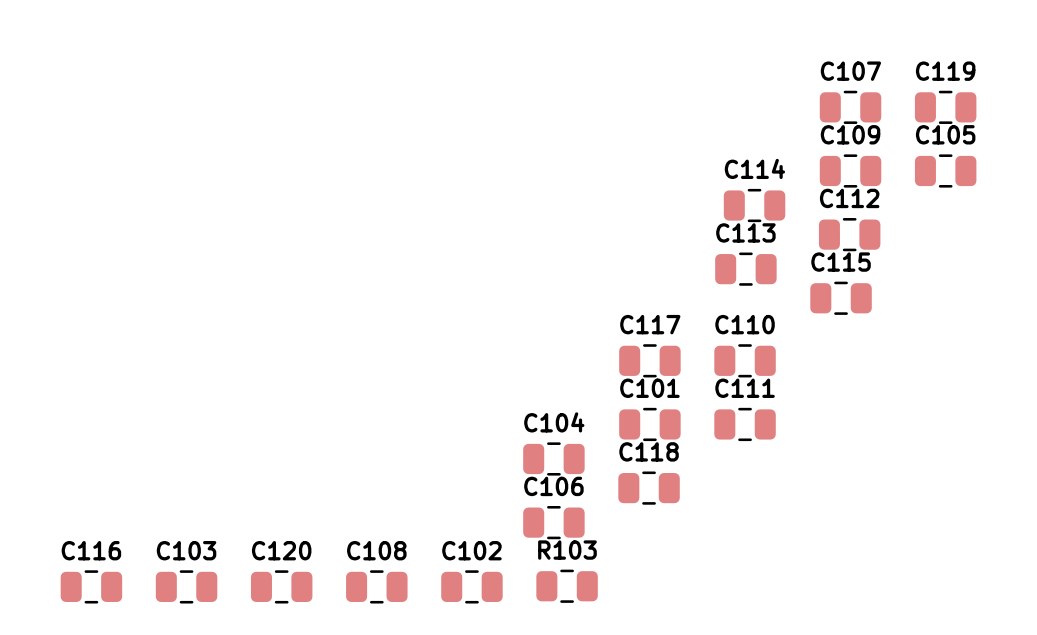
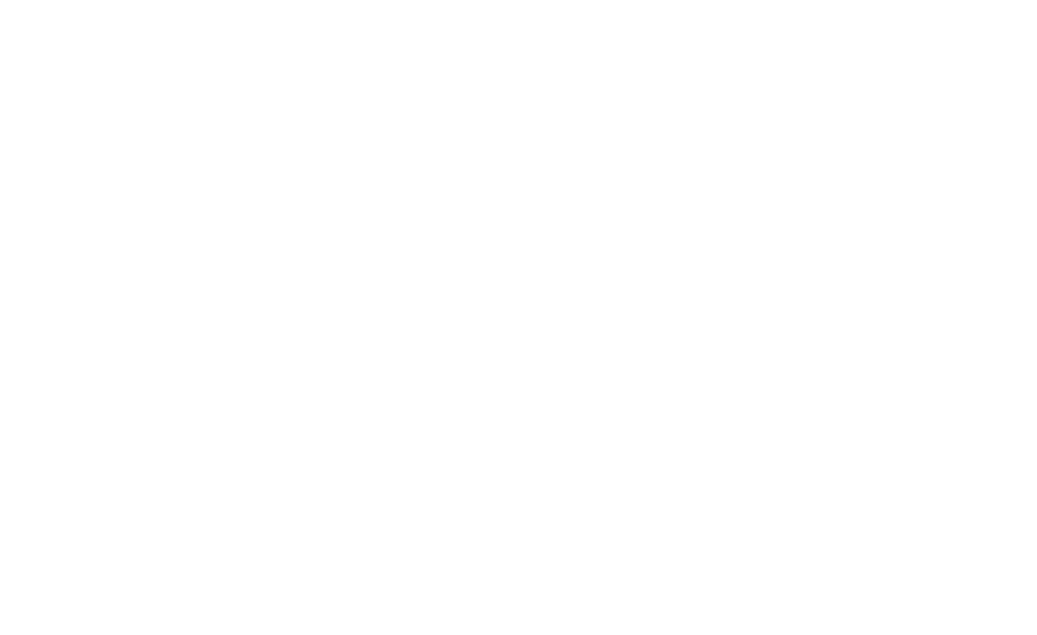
C107: (850, 107) -> none
C119: (945, 107) -> none
C109: (850, 170) -> none
C105: (945, 170) -> none
C114: (754, 205) -> none
C112: (849, 234) -> none
C113: (745, 269) -> none
C115: (841, 298) -> none
C117: (649, 360) -> none
C110: (745, 360) -> none
C101: (649, 424) -> none
C111: (745, 424) -> none
C104: (553, 458) -> none
C118: (649, 488) -> none
C106: (553, 522) -> none
C116: (91, 586) -> none
C103: (186, 586) -> none
C120: (281, 586) -> none
C108: (376, 586) -> none
C102: (471, 586) -> none
R103: (567, 586) -> none

